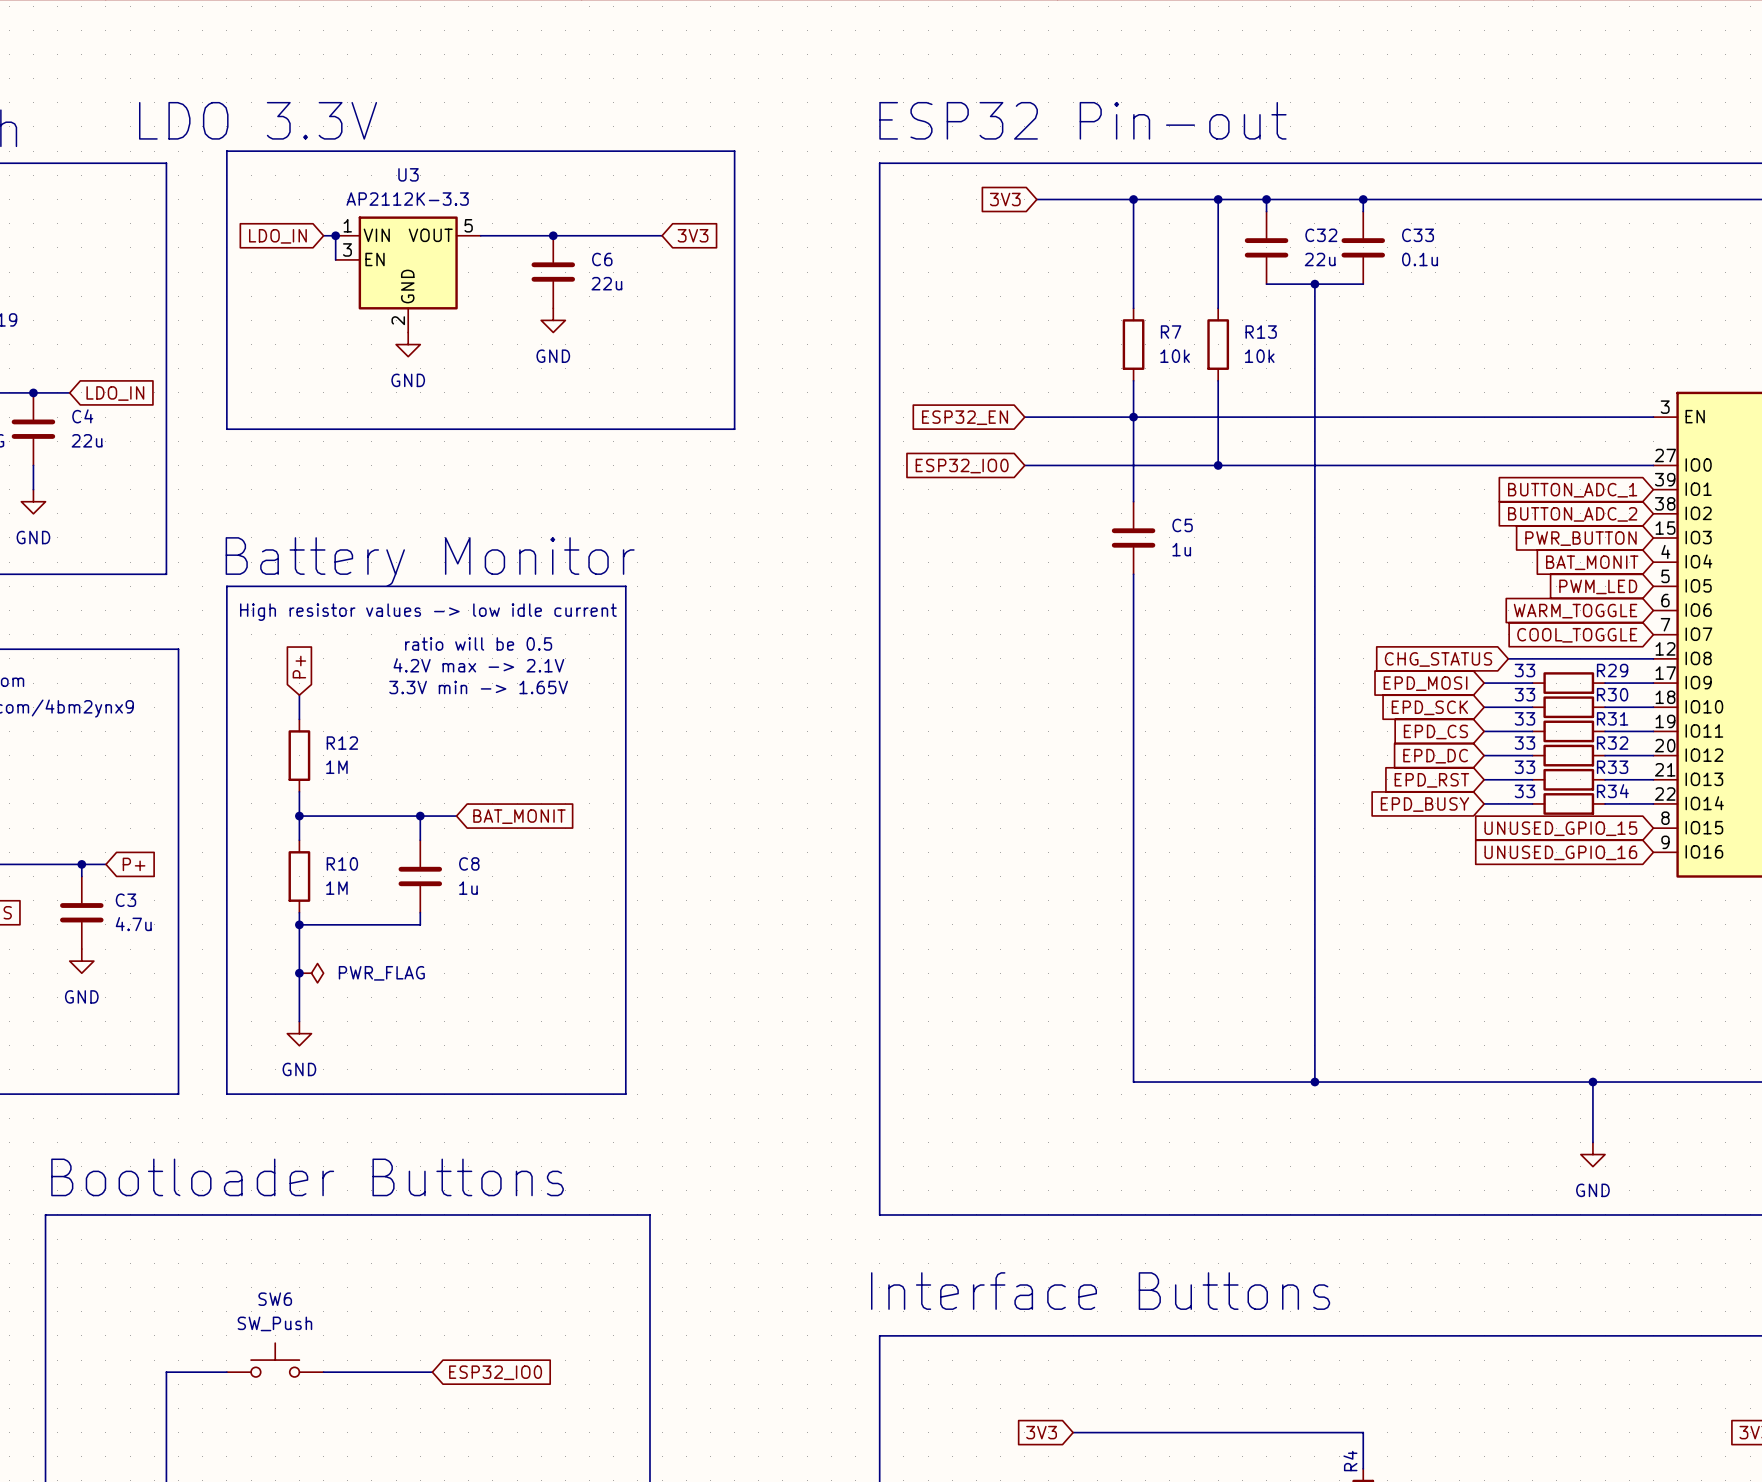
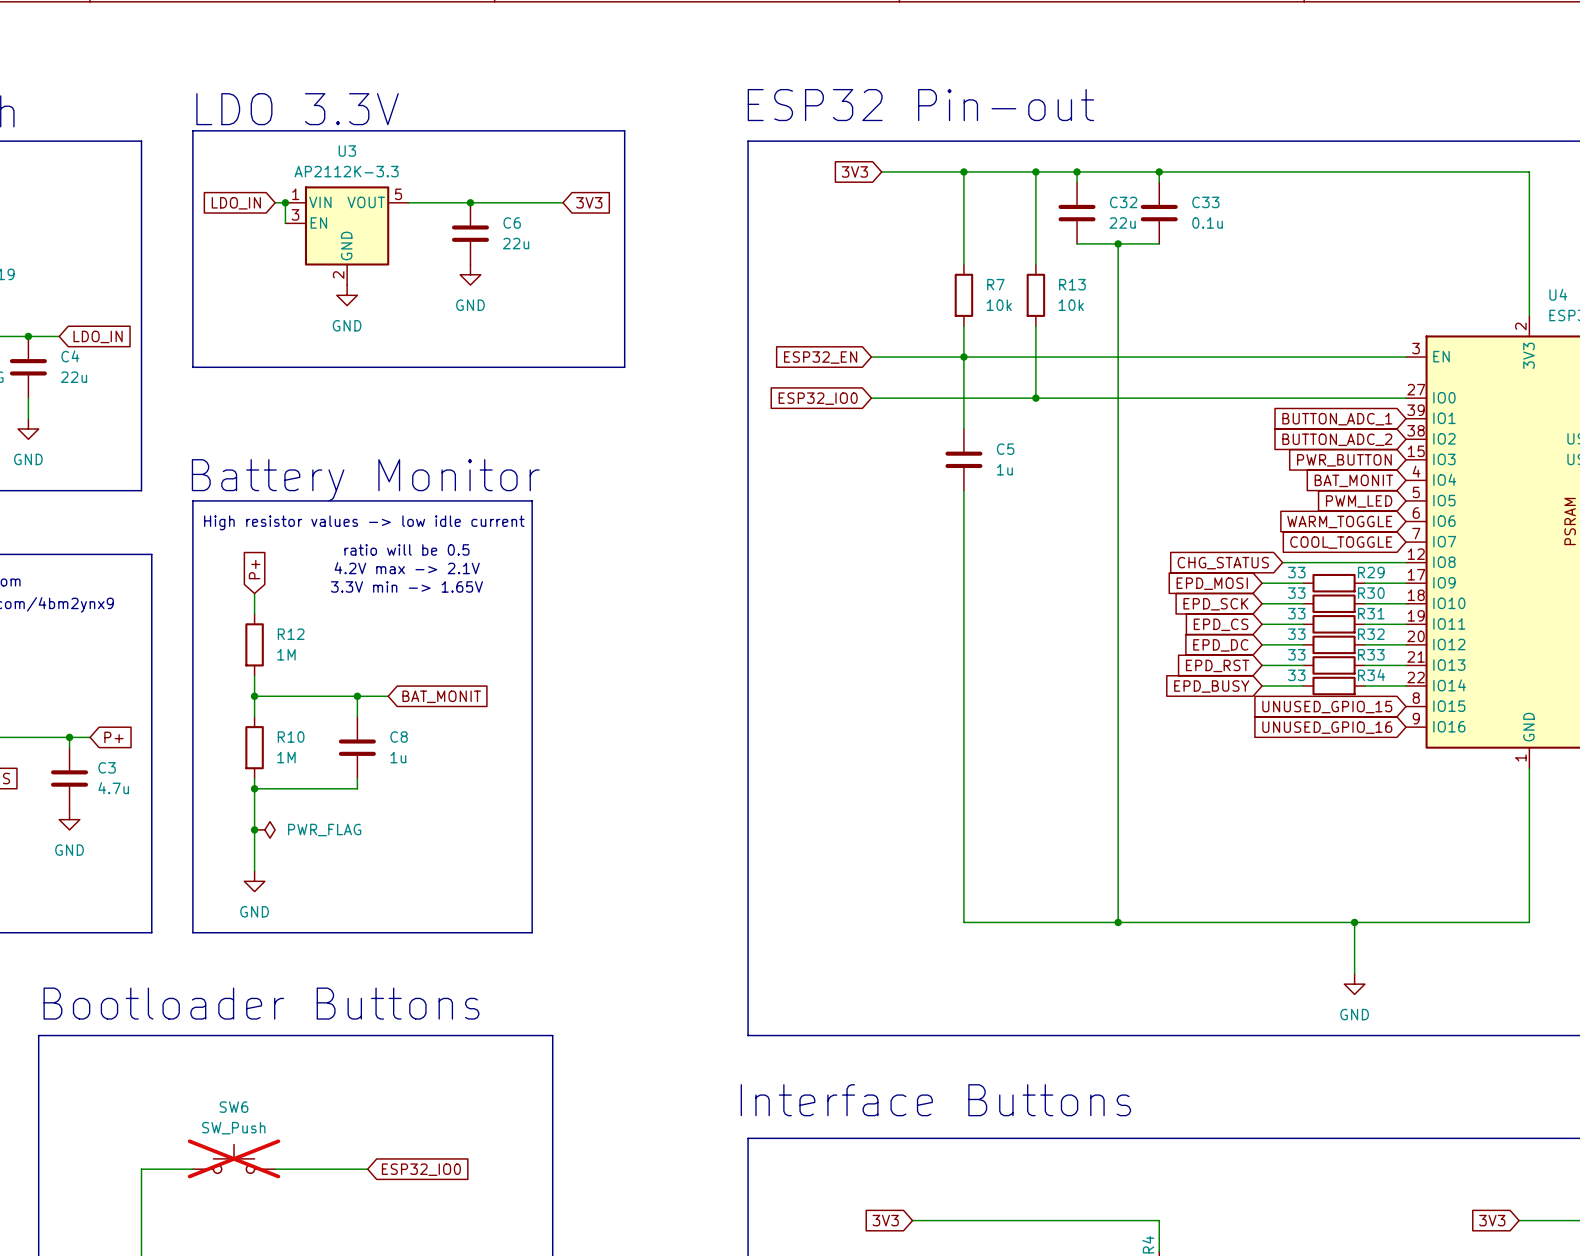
text position: LDO 3.3V (258, 120) -> LDO 3.3V (297, 109)
SW6 do-not-place cross: none -> (234, 1158)

